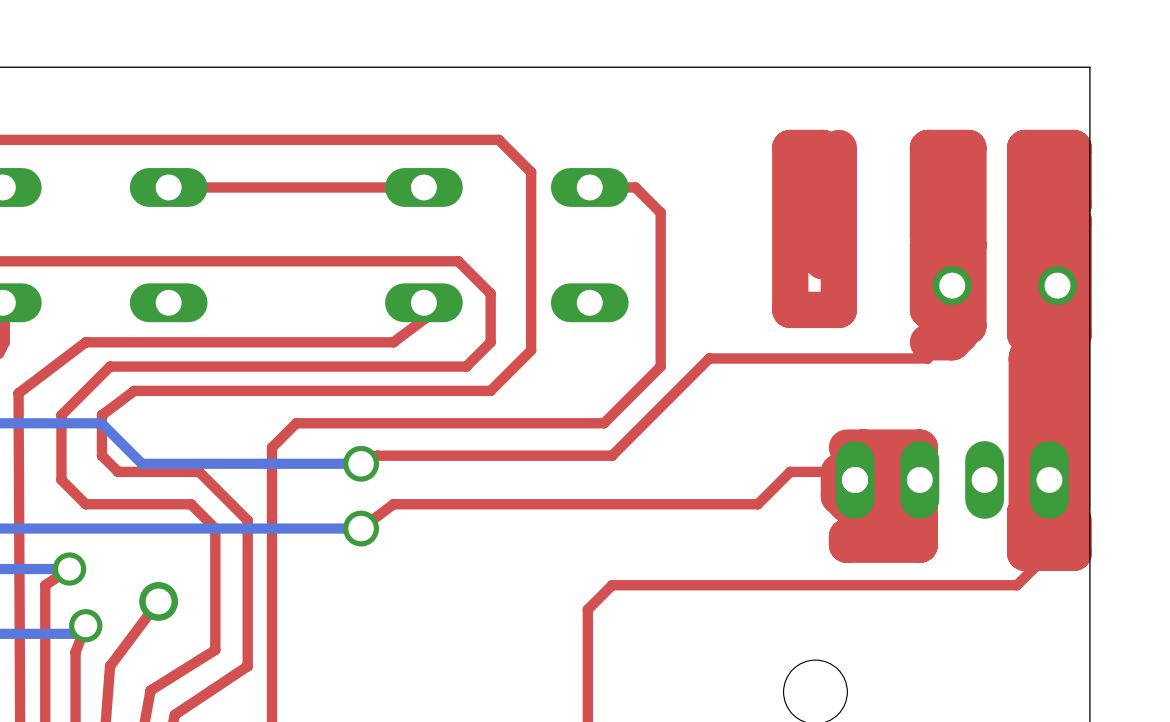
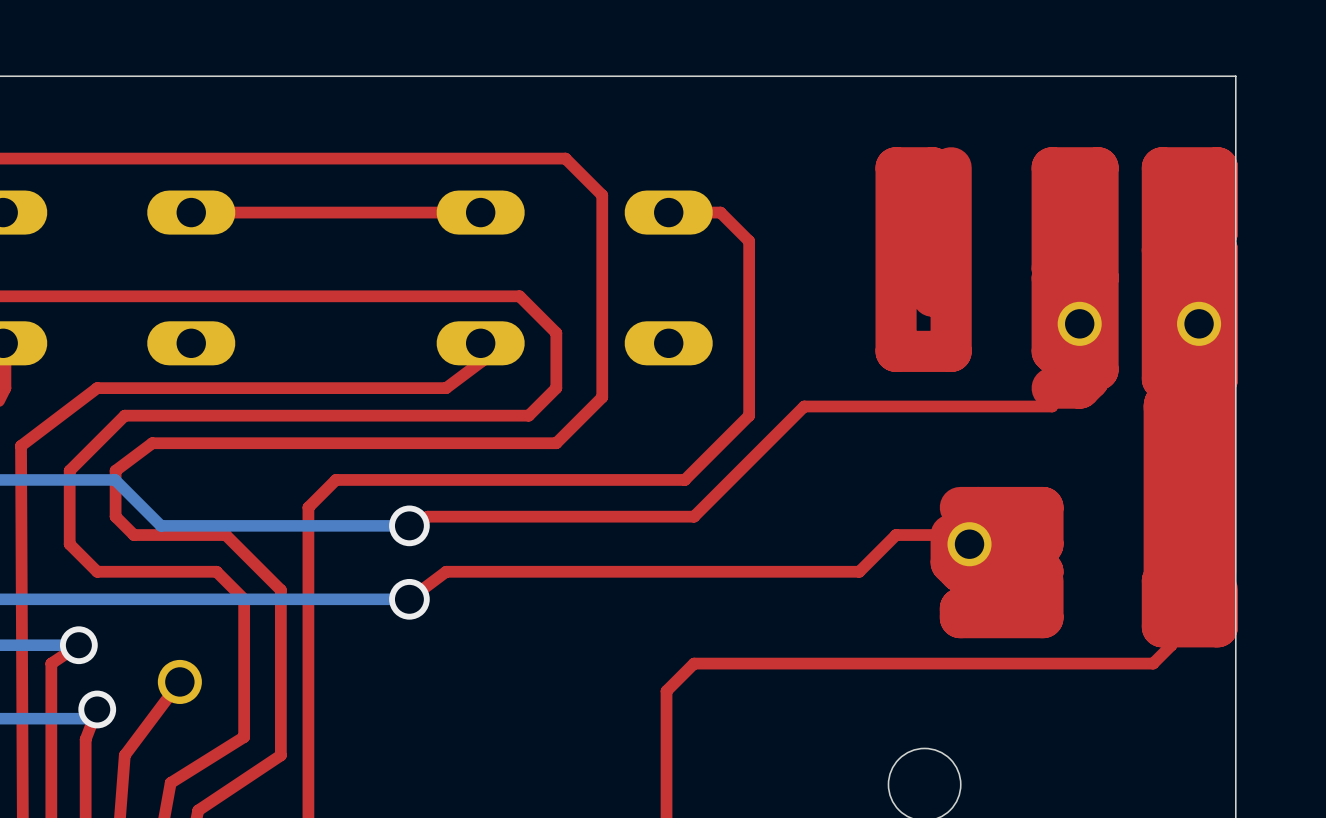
part: (952, 479) -> none

